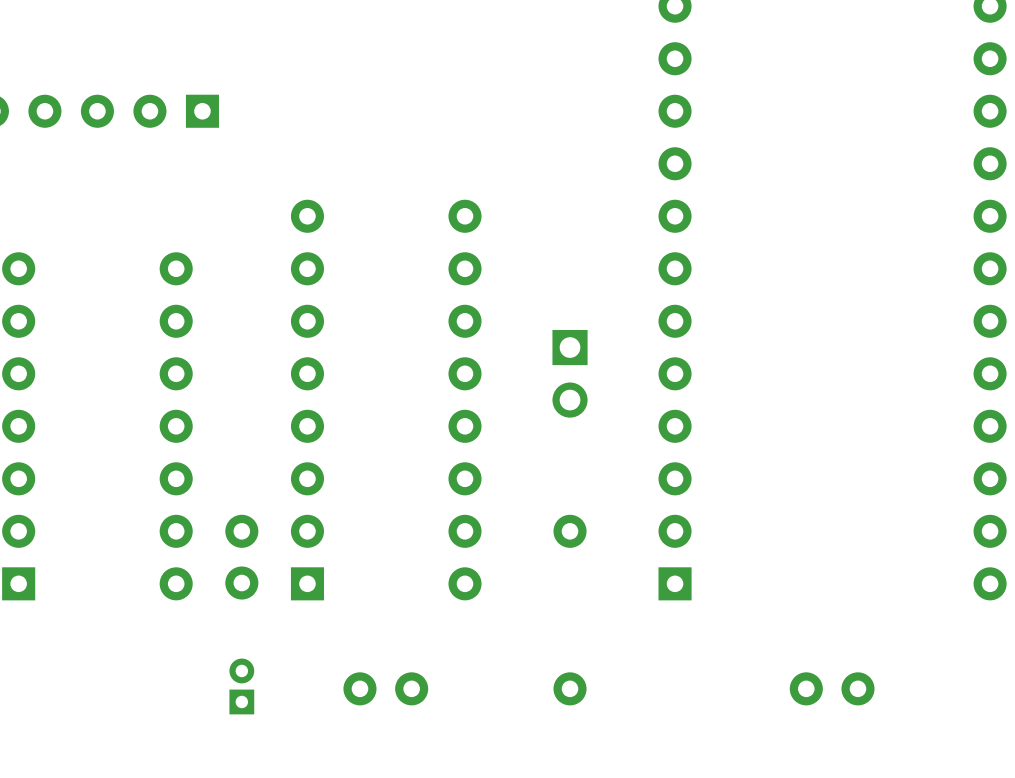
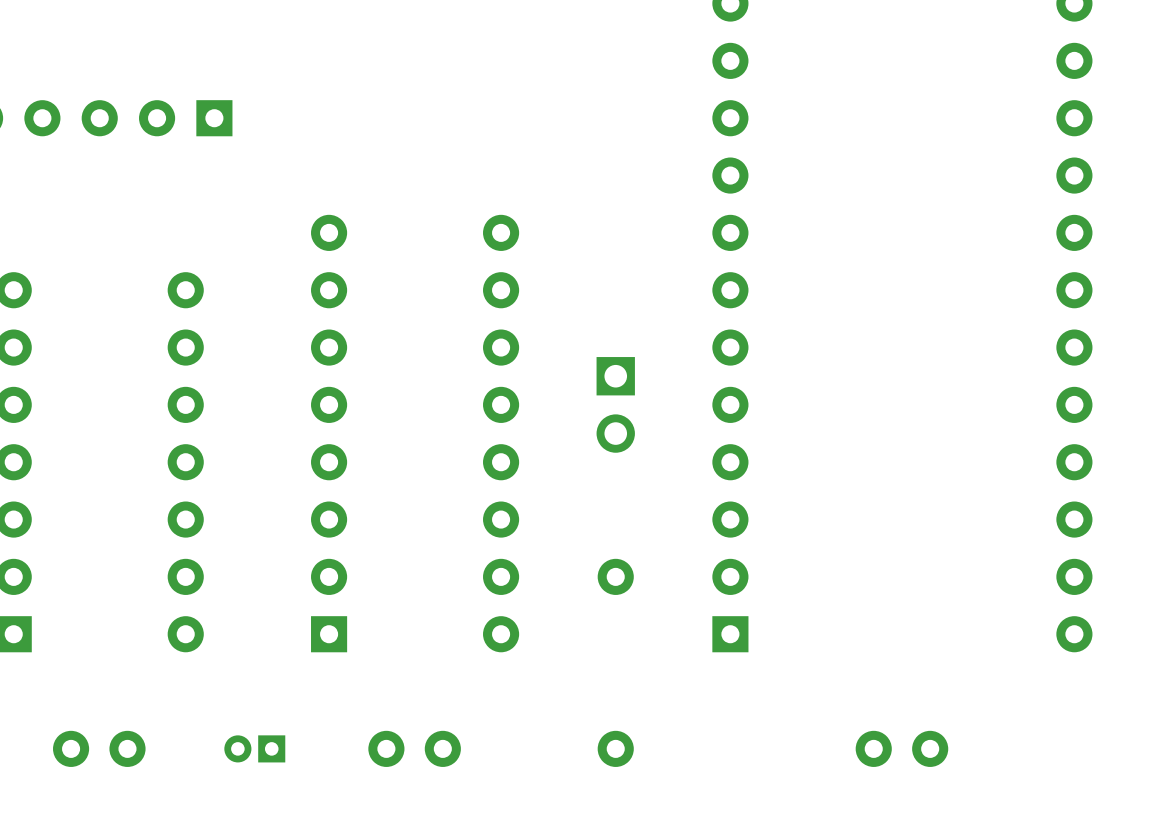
part rotation: 0° (241, 557) -> 90° clockwise (99, 748)
part position: (241, 557) -> (99, 748)
part rotation: 0° (241, 686) -> 90° counterclockwise (254, 748)

